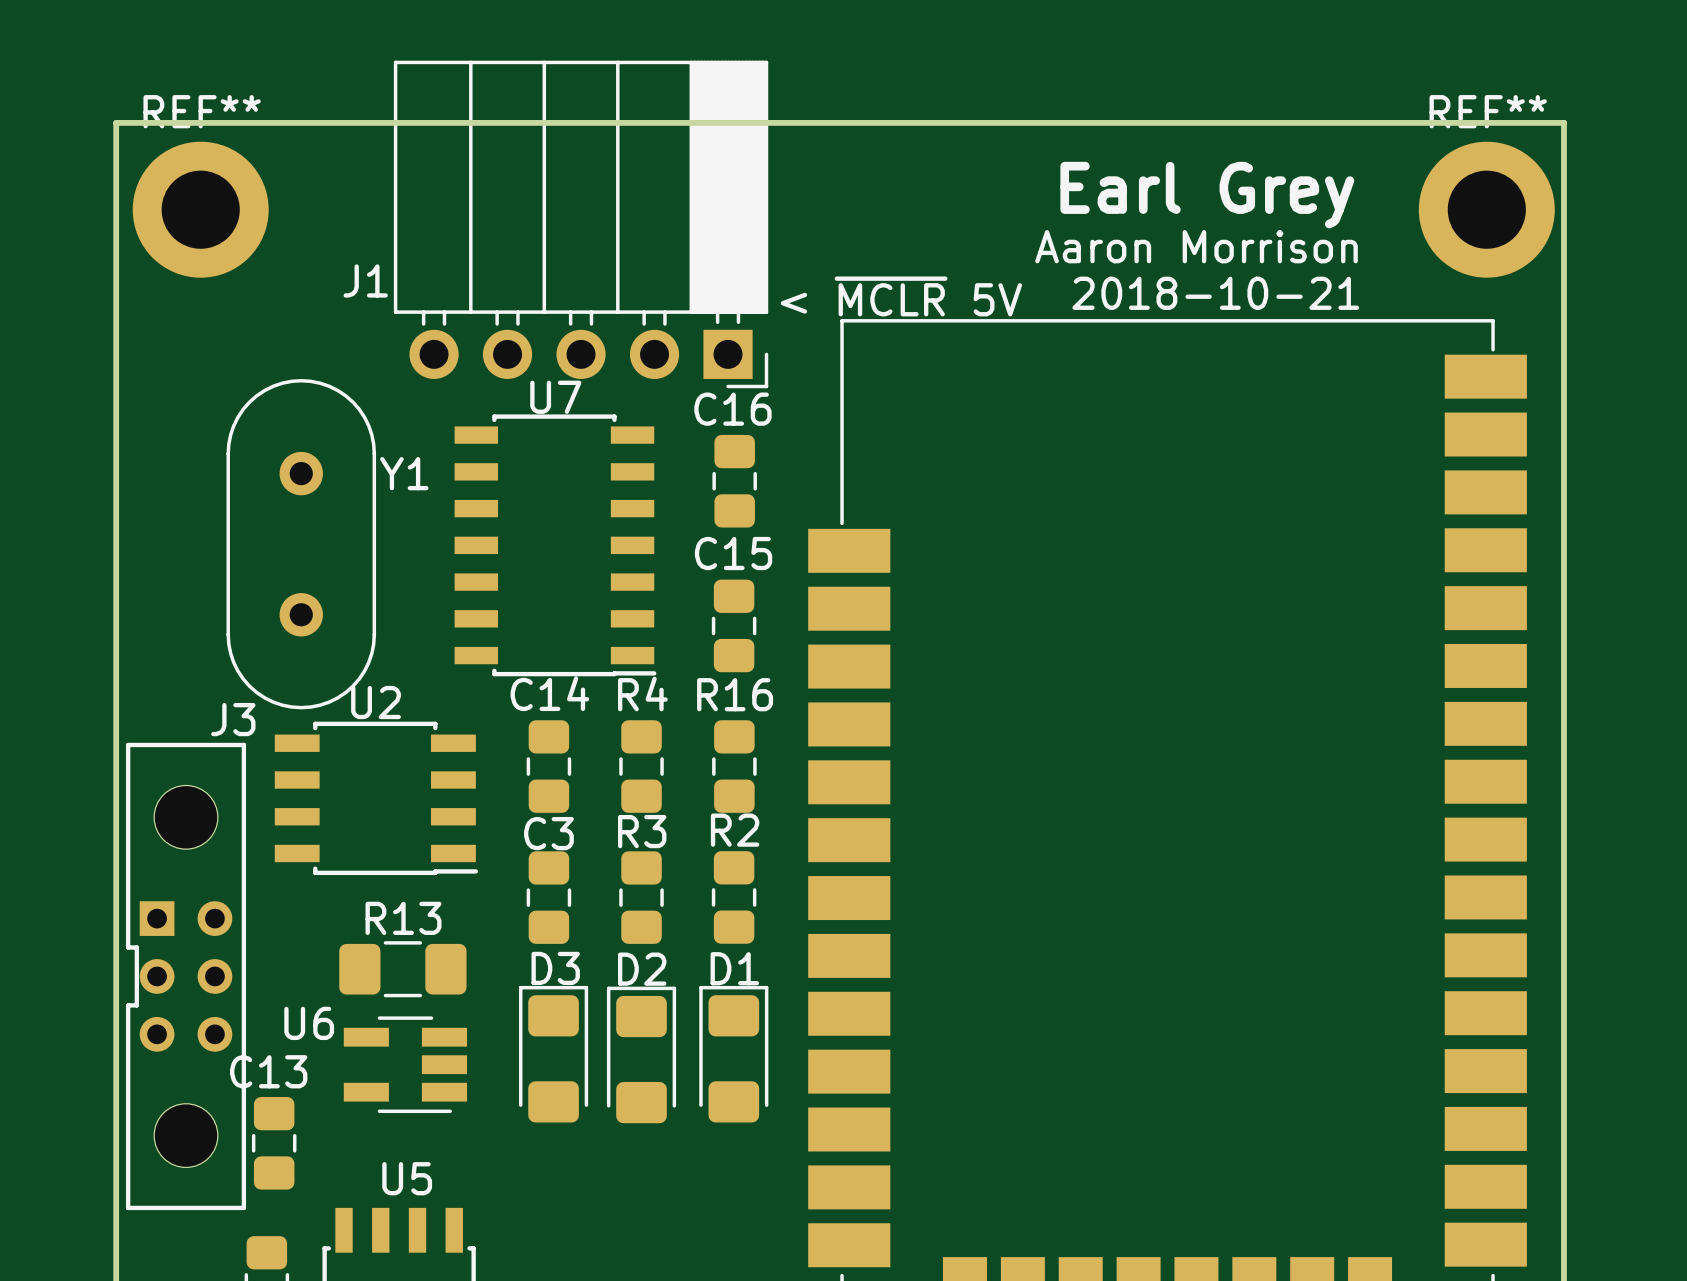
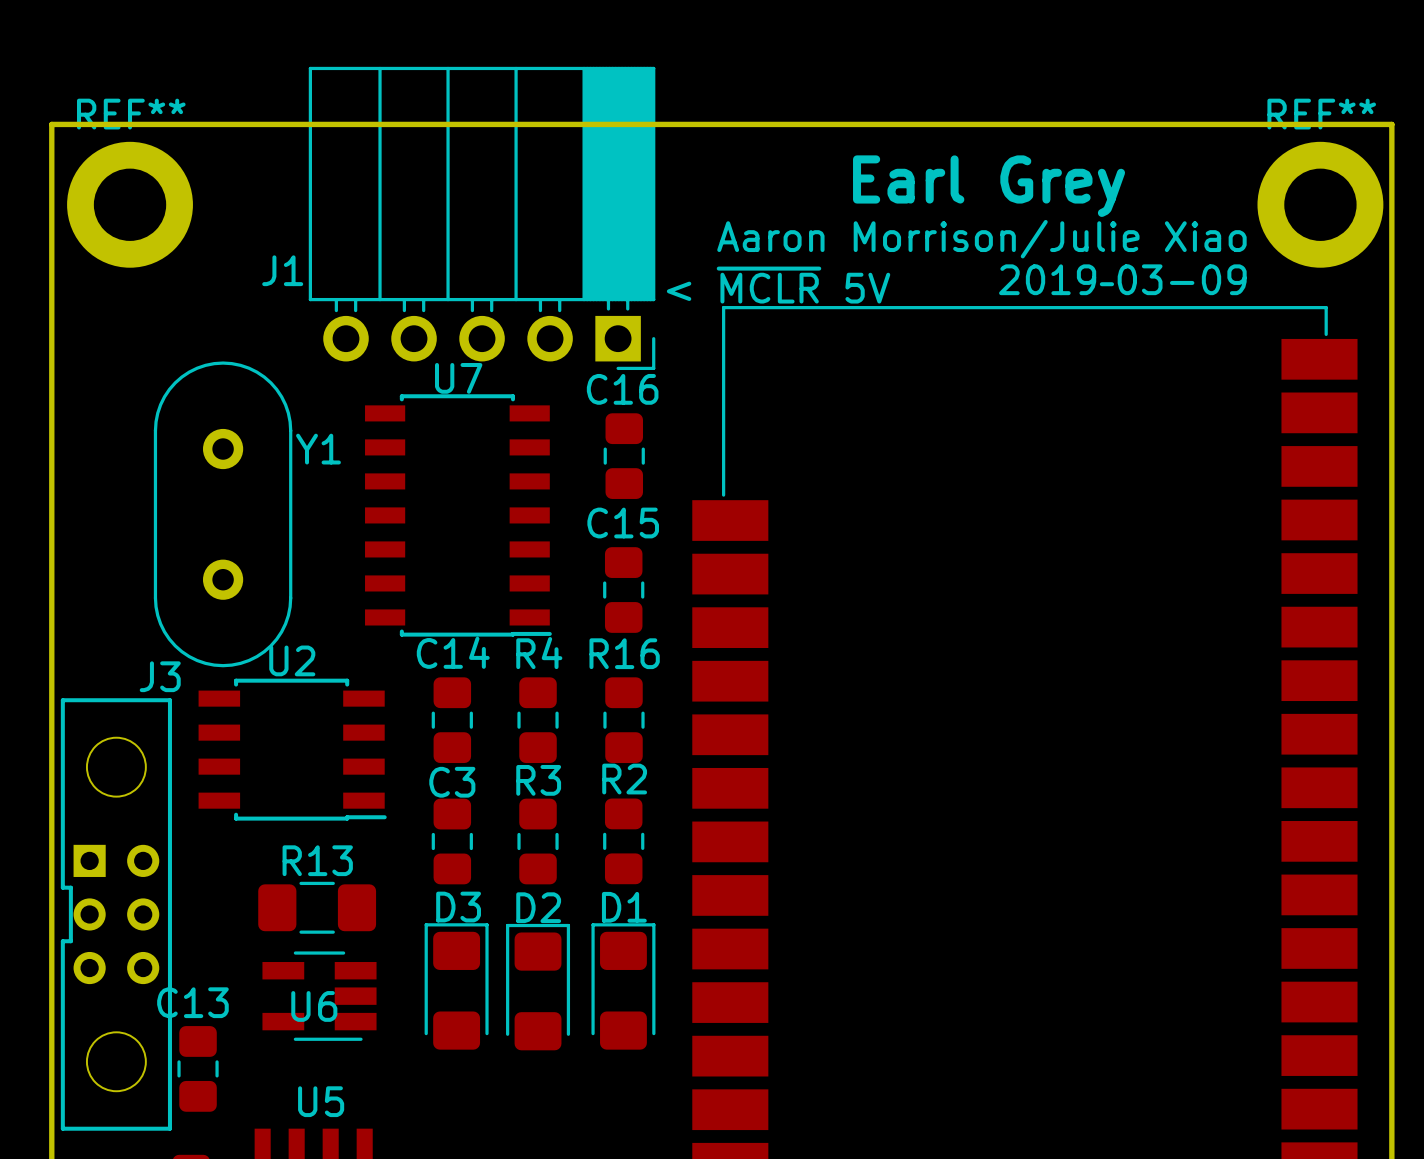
text position: Earl Grey (1207, 195) -> Earl Grey (989, 186)
text: Aaron Morrison (1196, 246) -> Aaron Morrison/Julie Xiao (981, 239)
text: none -> 2019–03-09 (1122, 279)
text: 2018-10-21 (1215, 293) -> none
U6 name position: U6 (309, 1023) -> U6 (314, 1006)

